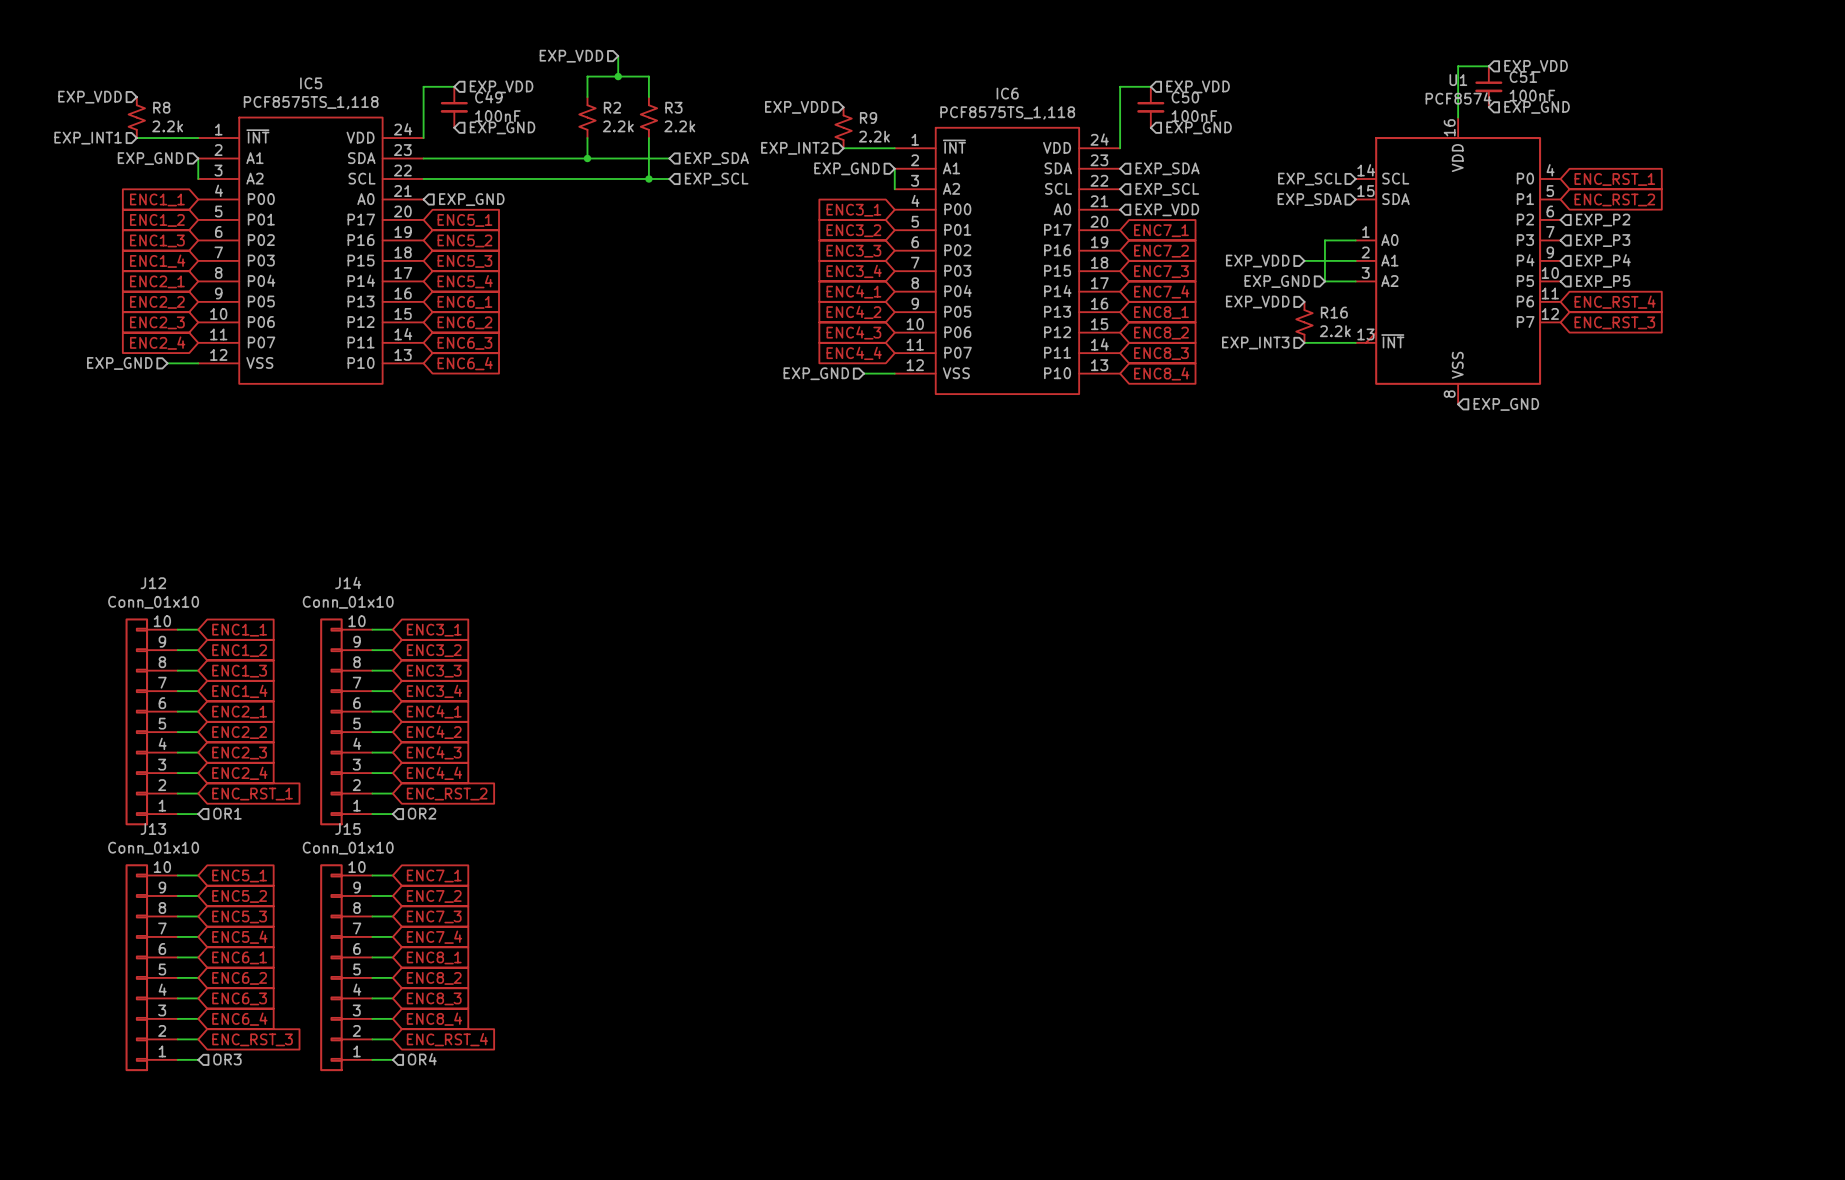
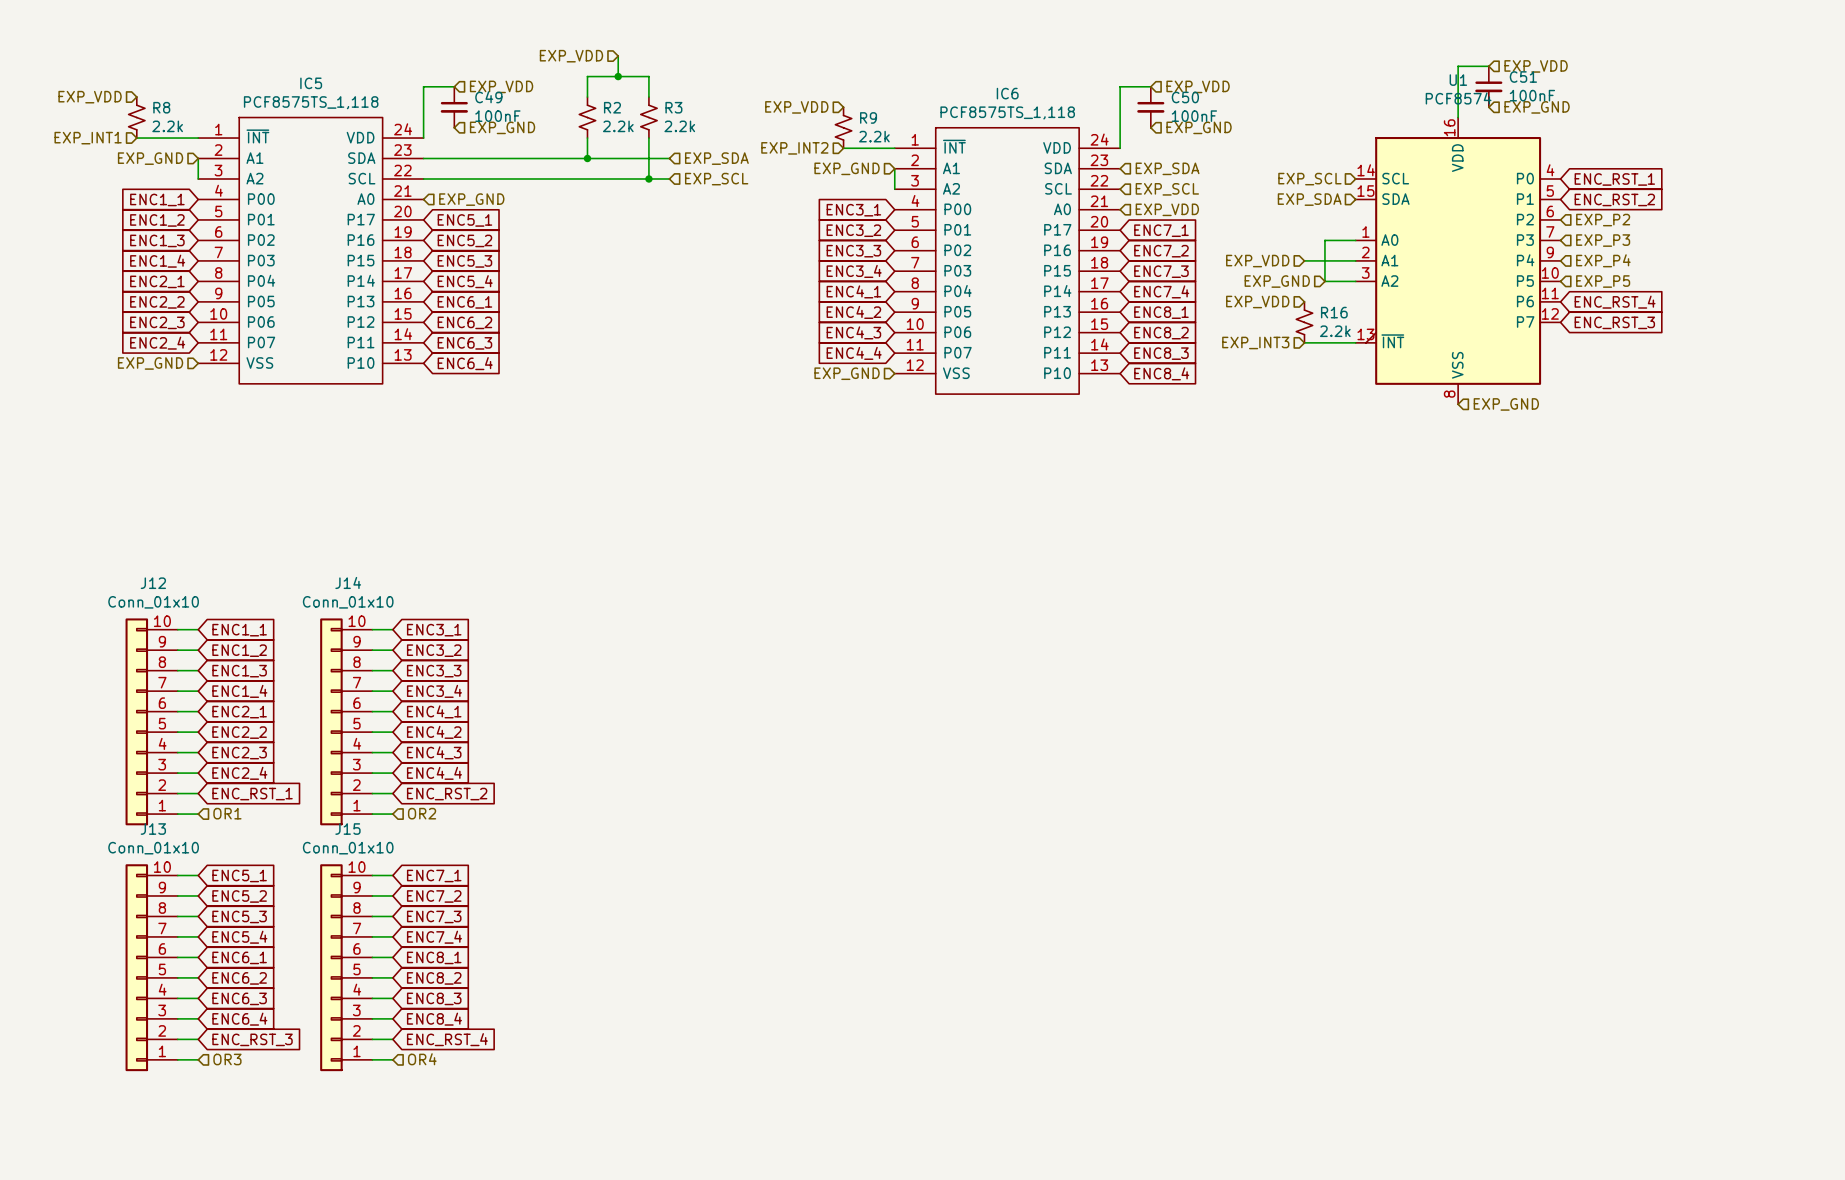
hierarchical label position: EXP_GND (119, 363) -> EXP_GND (150, 363)
wire: (167, 363) (198, 363) -> none
hierarchical label position: EXP_GND (816, 373) -> EXP_GND (847, 373)
wire: (864, 373) (894, 373) -> none

